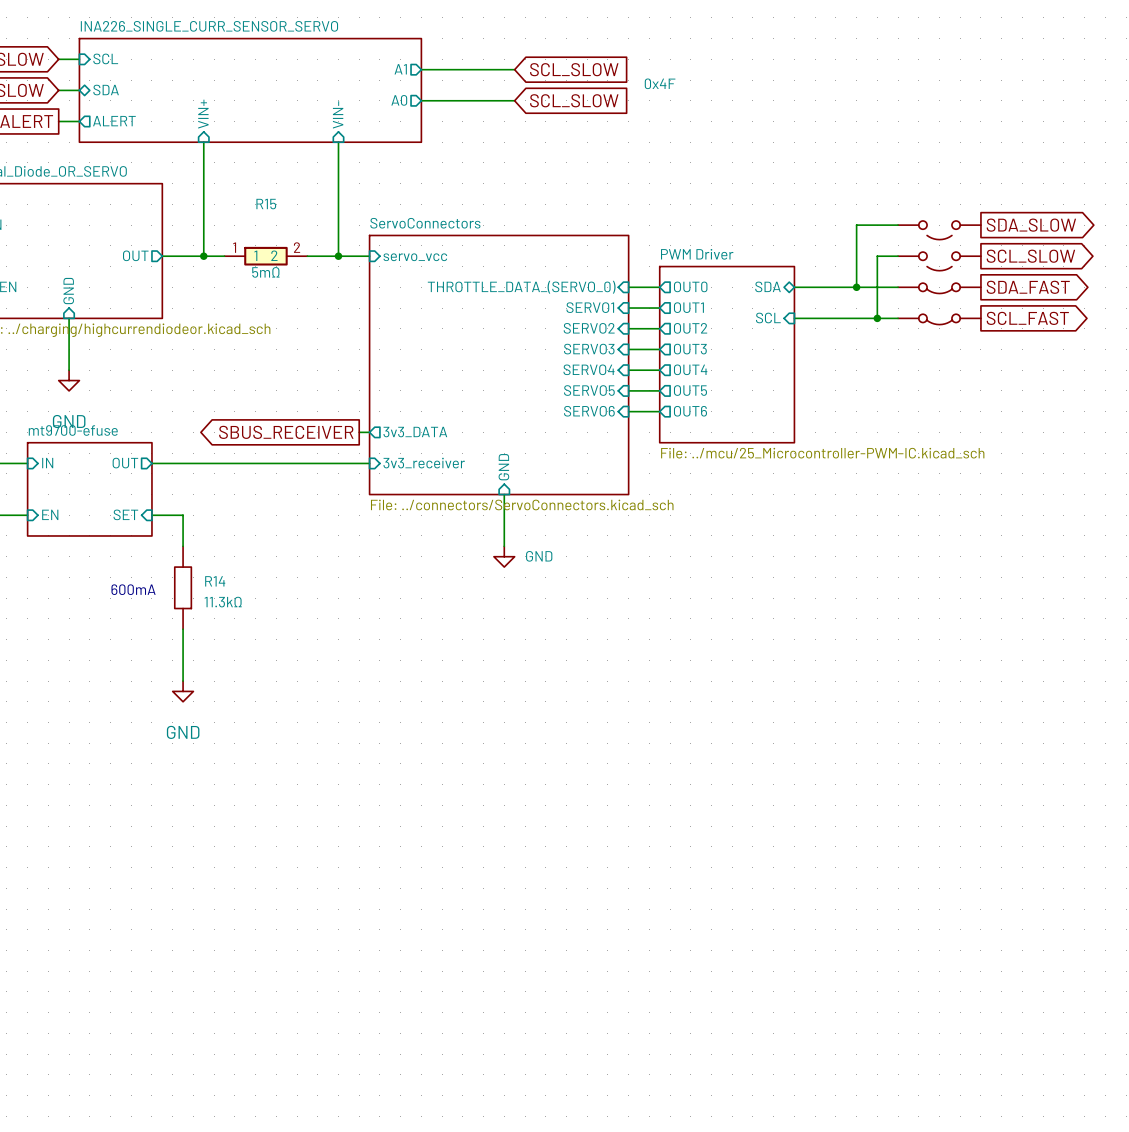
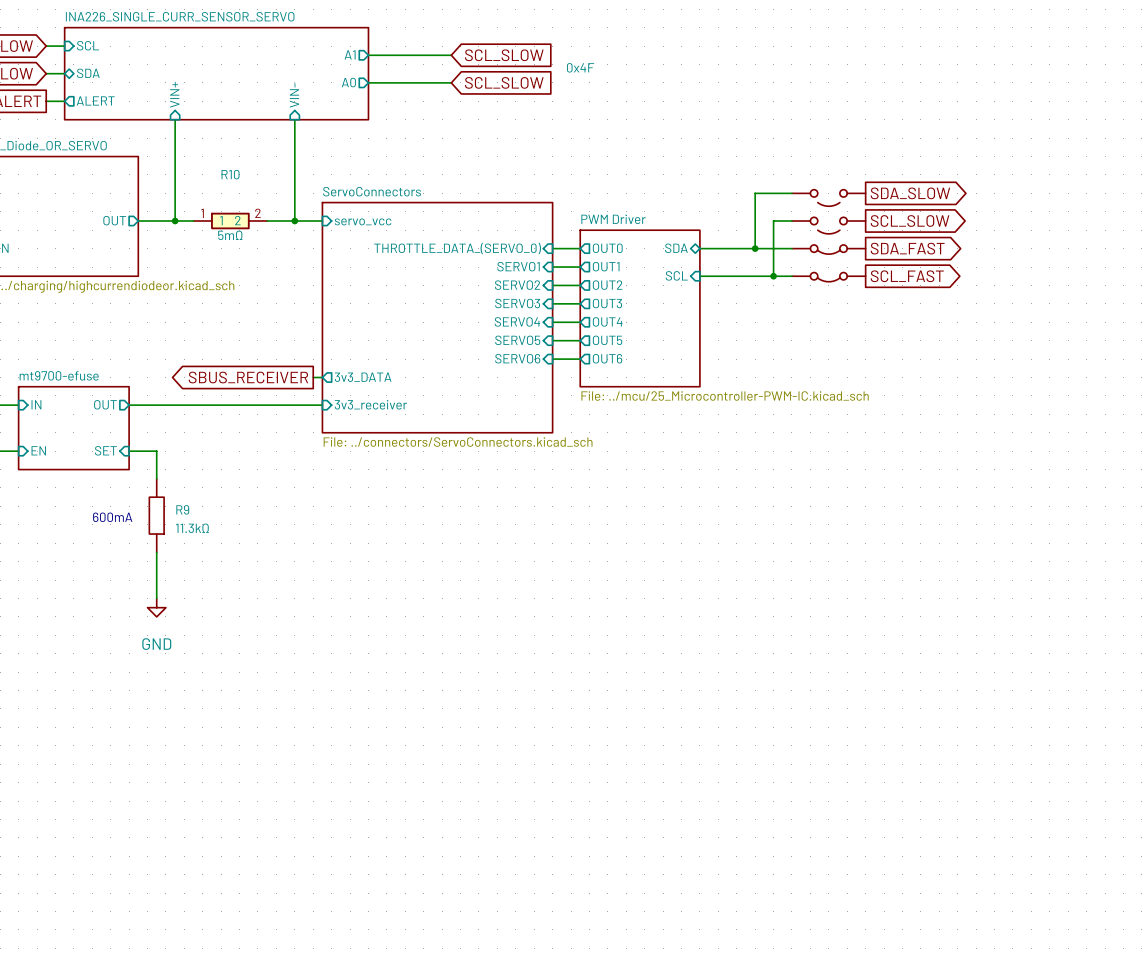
R15 name: R15 (266, 204) -> R10 (230, 174)
sheet pin: GND (68, 291) -> none
wire: (69, 318) (69, 370) -> none
power symbol: GND (69, 380) -> none
sheet pin: GND (503, 467) -> none
wire: (504, 494) (504, 546) -> none
power symbol: GND (504, 556) -> none
R14 name: R14 (215, 581) -> R9 (182, 509)

